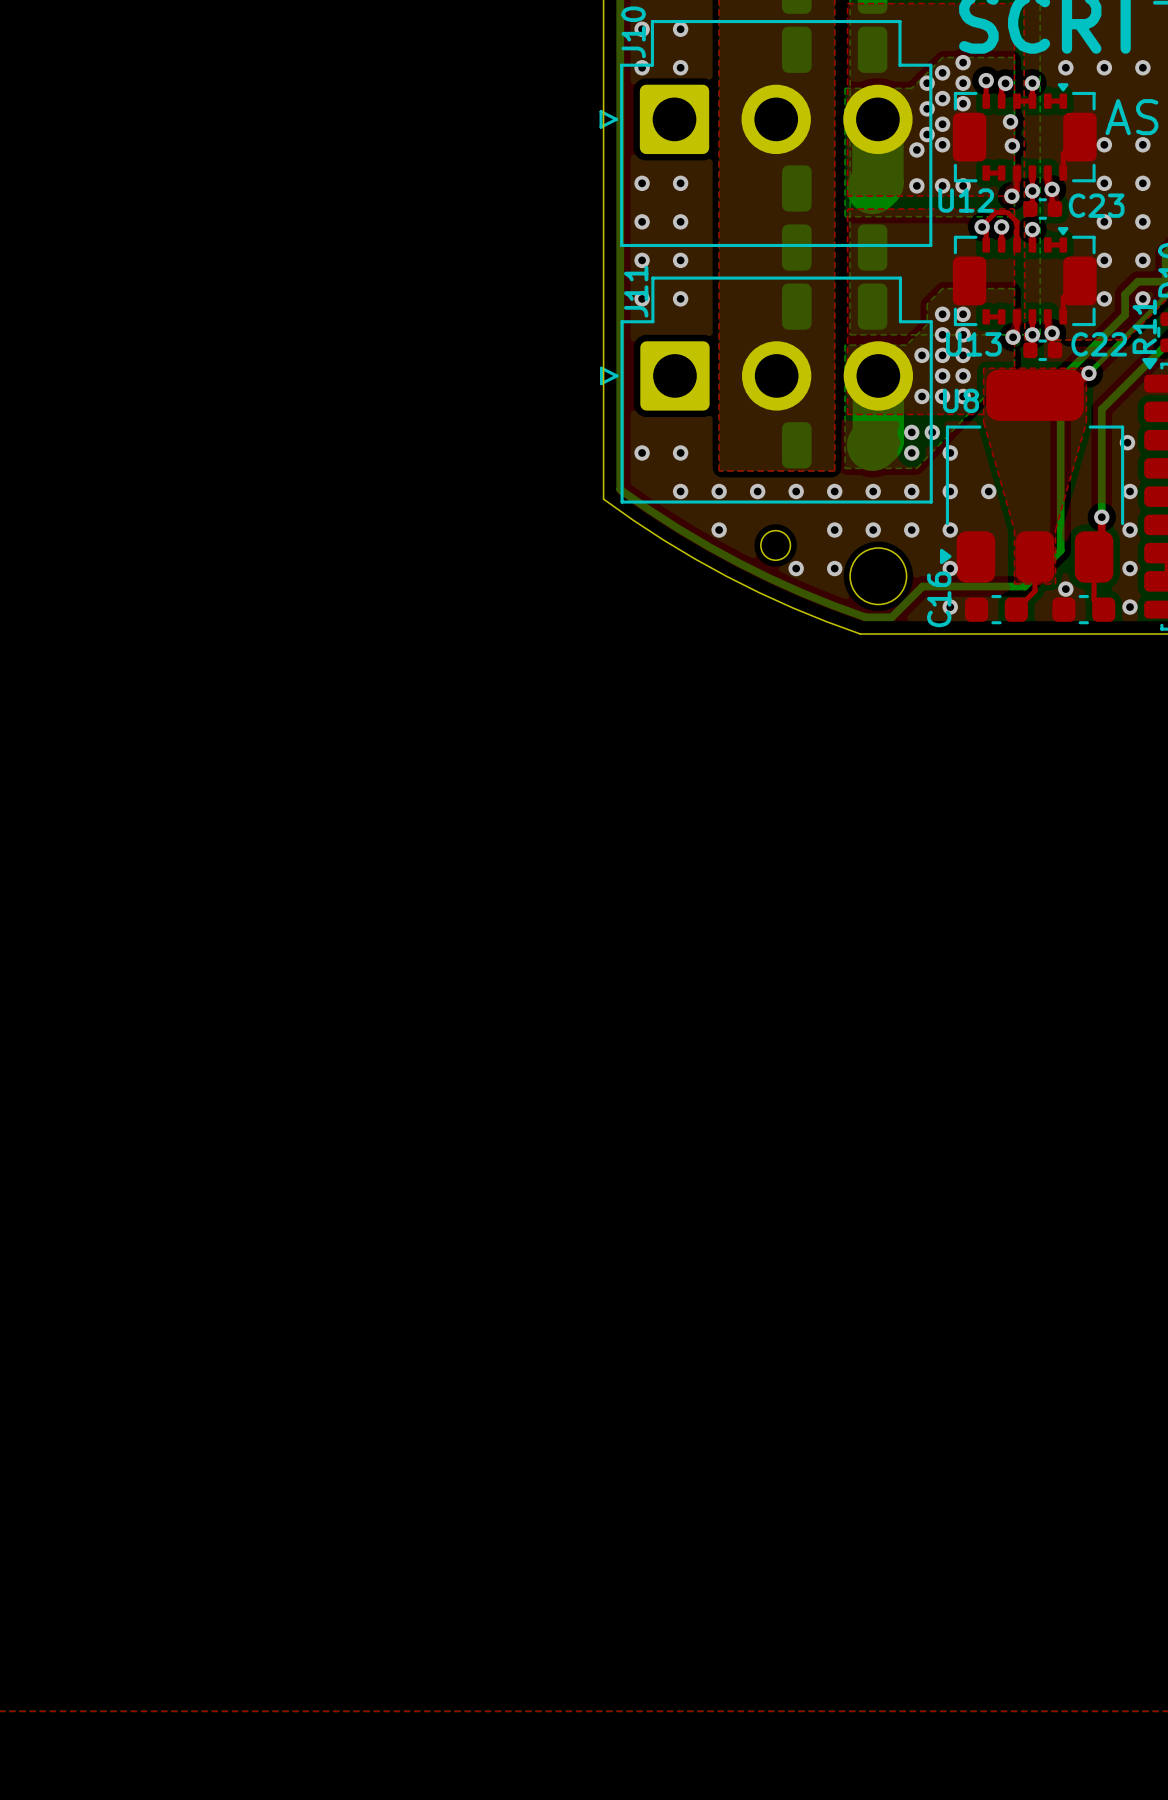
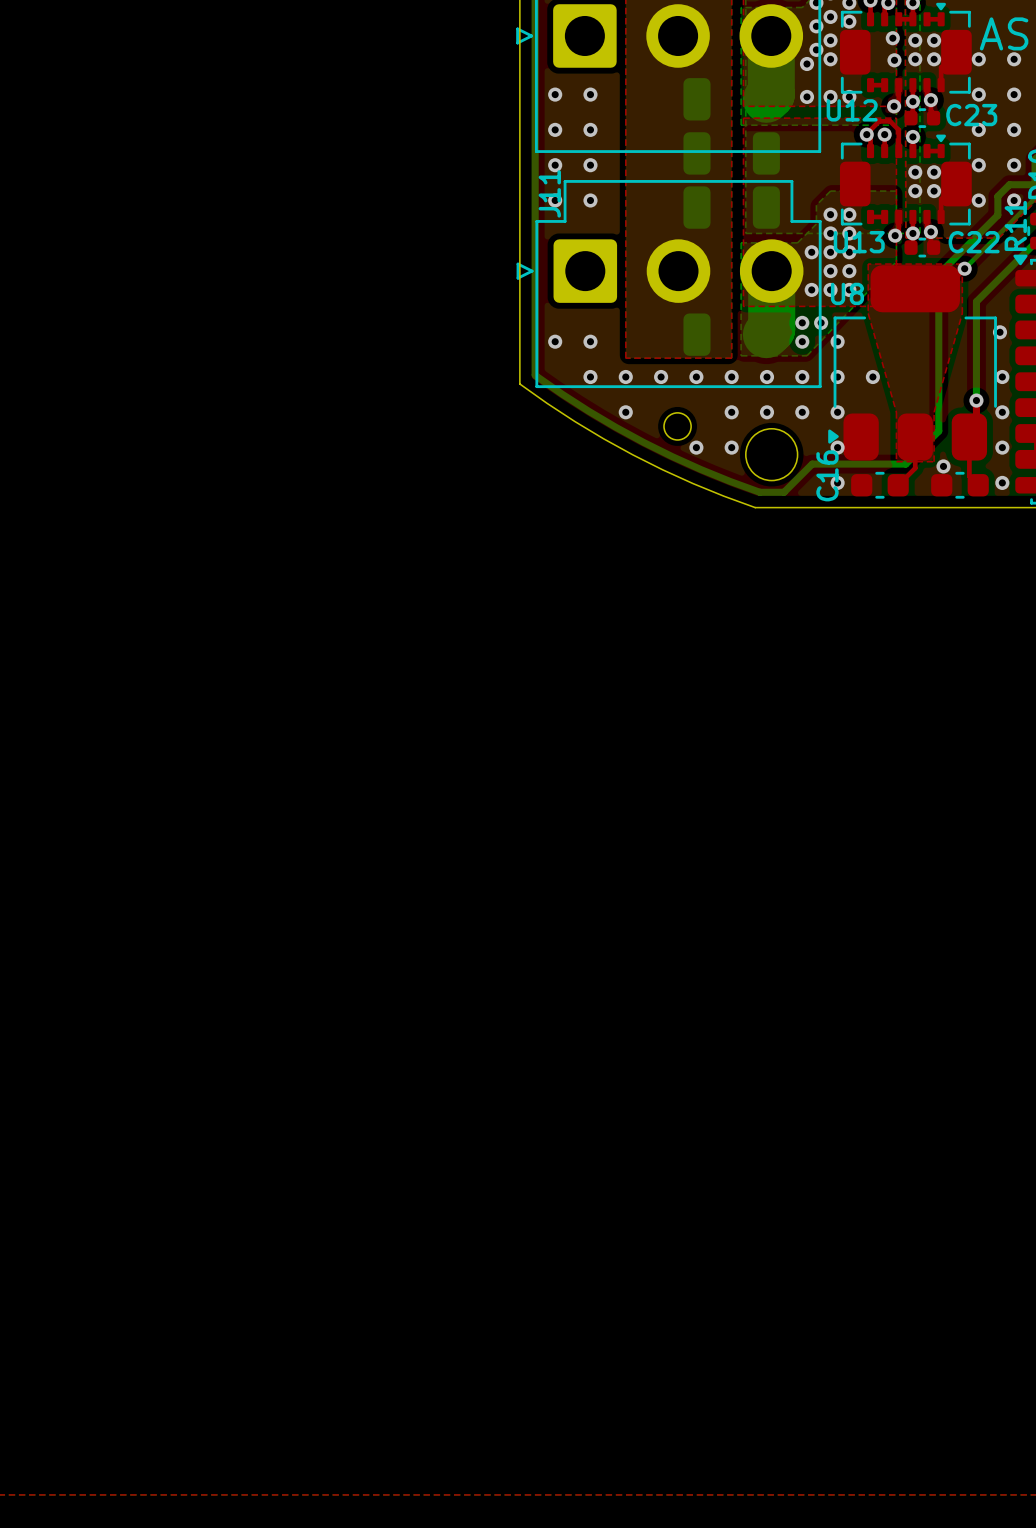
via: none -> (915, 40)
via: none -> (934, 40)
via: none -> (915, 59)
via: none -> (934, 59)
via: none -> (915, 172)
via: none -> (934, 172)
via: none -> (915, 191)
via: none -> (934, 191)

